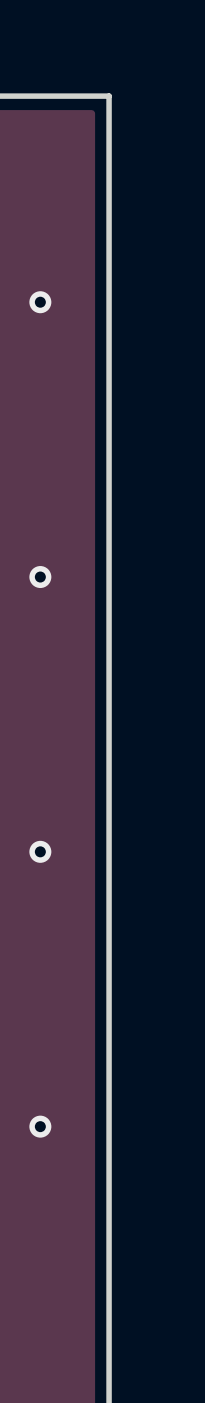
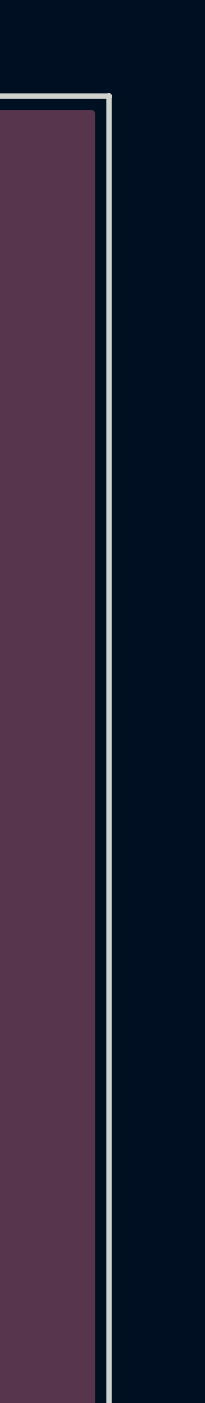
via: (40, 302) -> none
via: (40, 577) -> none
via: (40, 851) -> none
via: (40, 1126) -> none

